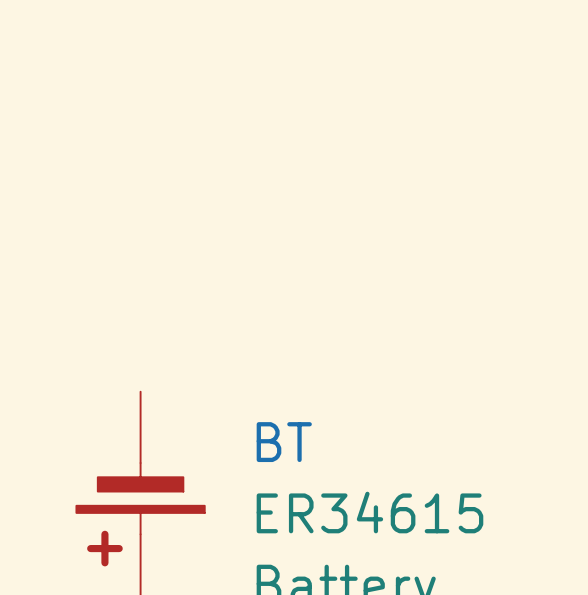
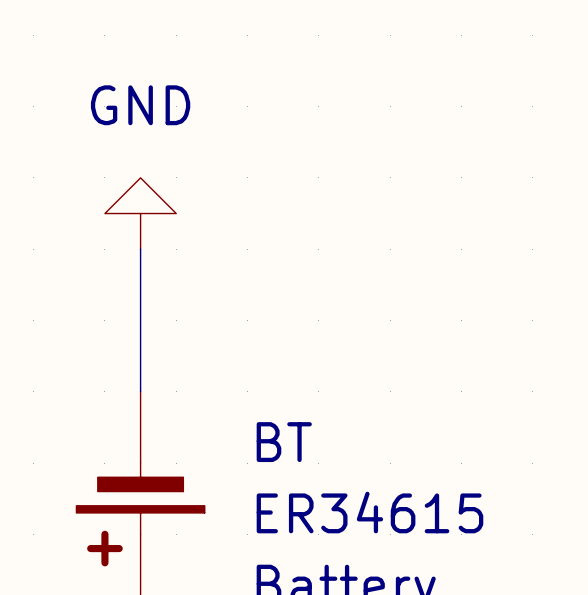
power symbol: none -> GND (140, 213)
wire: none -> (140, 249) (140, 391)

